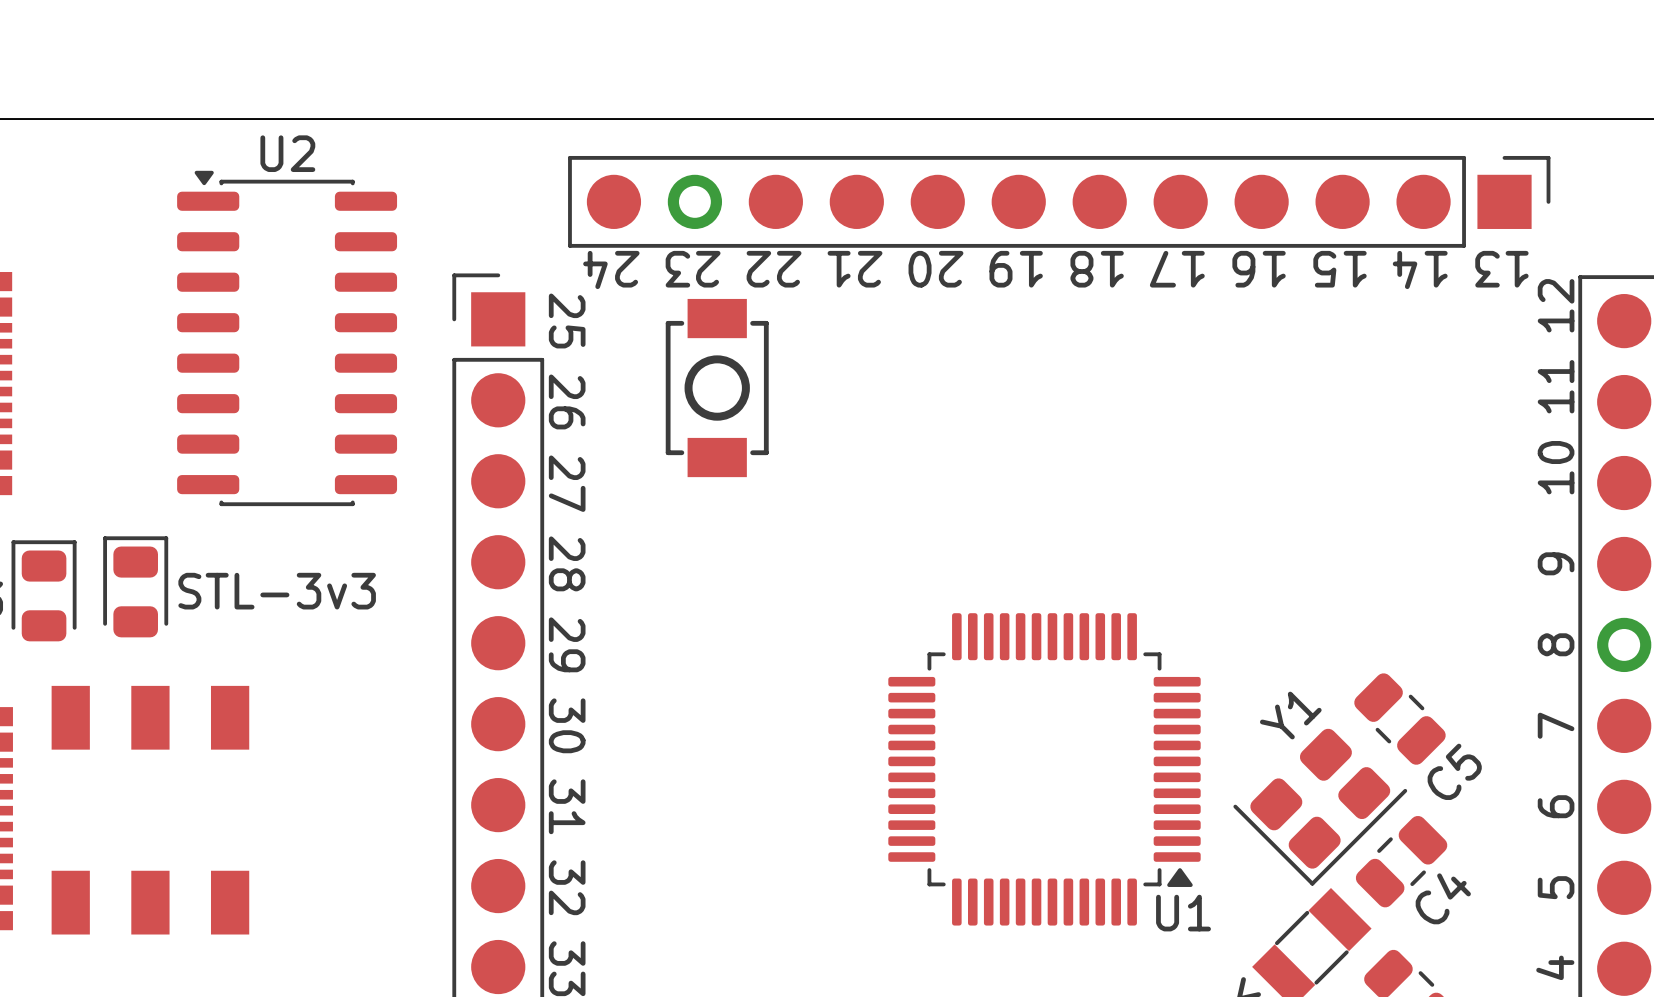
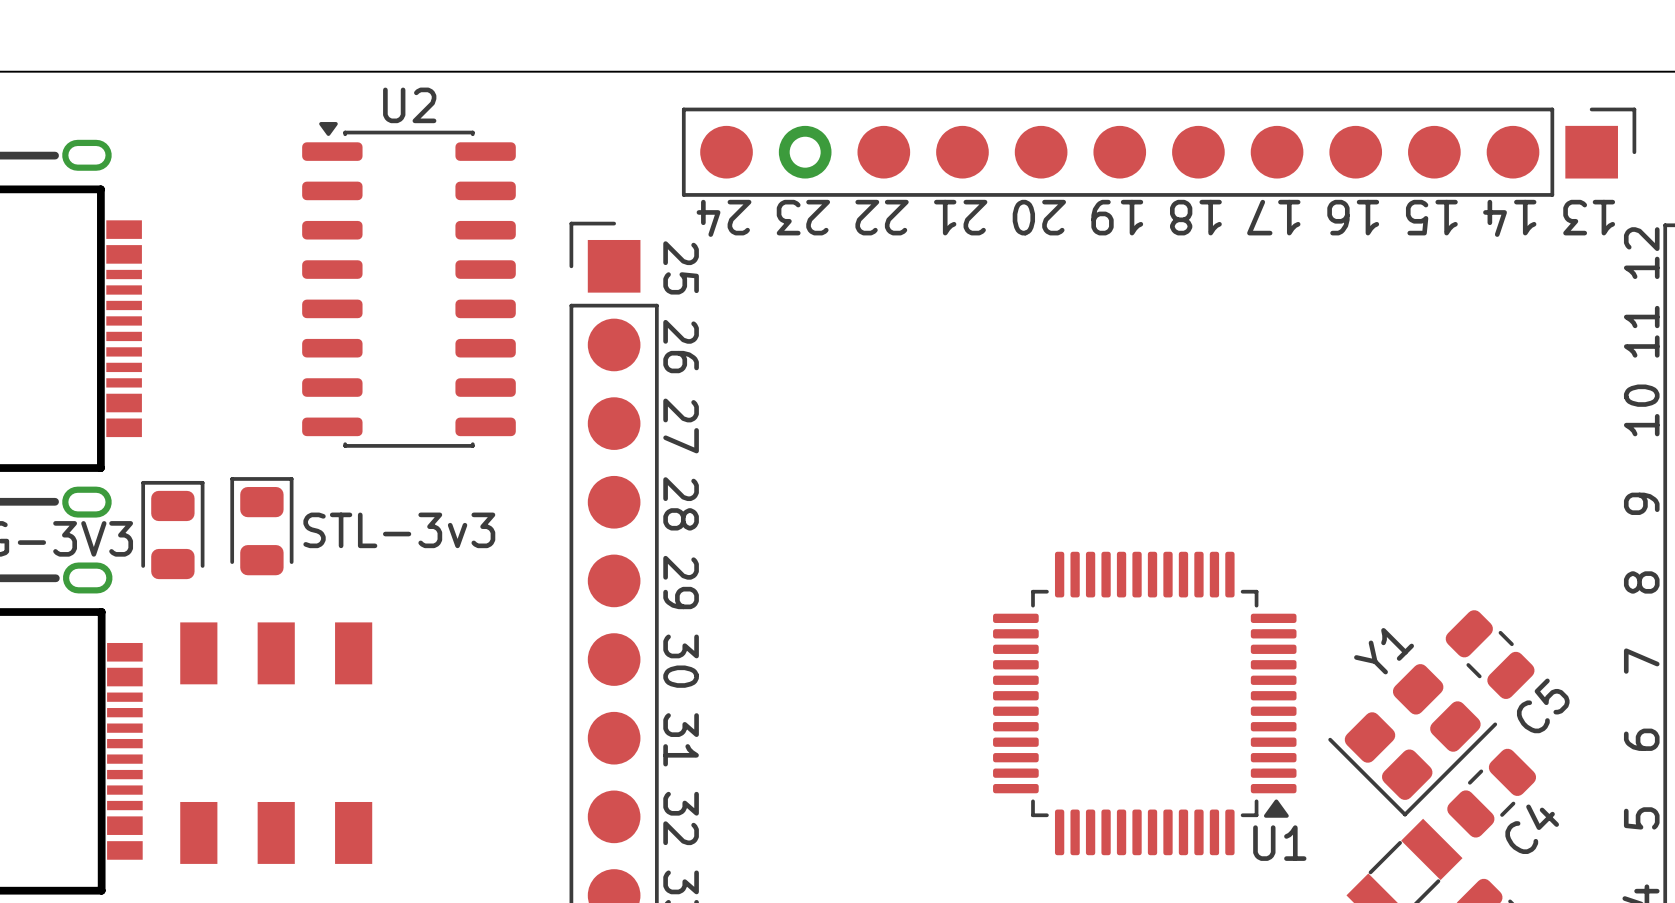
part: (717, 388) -> none

